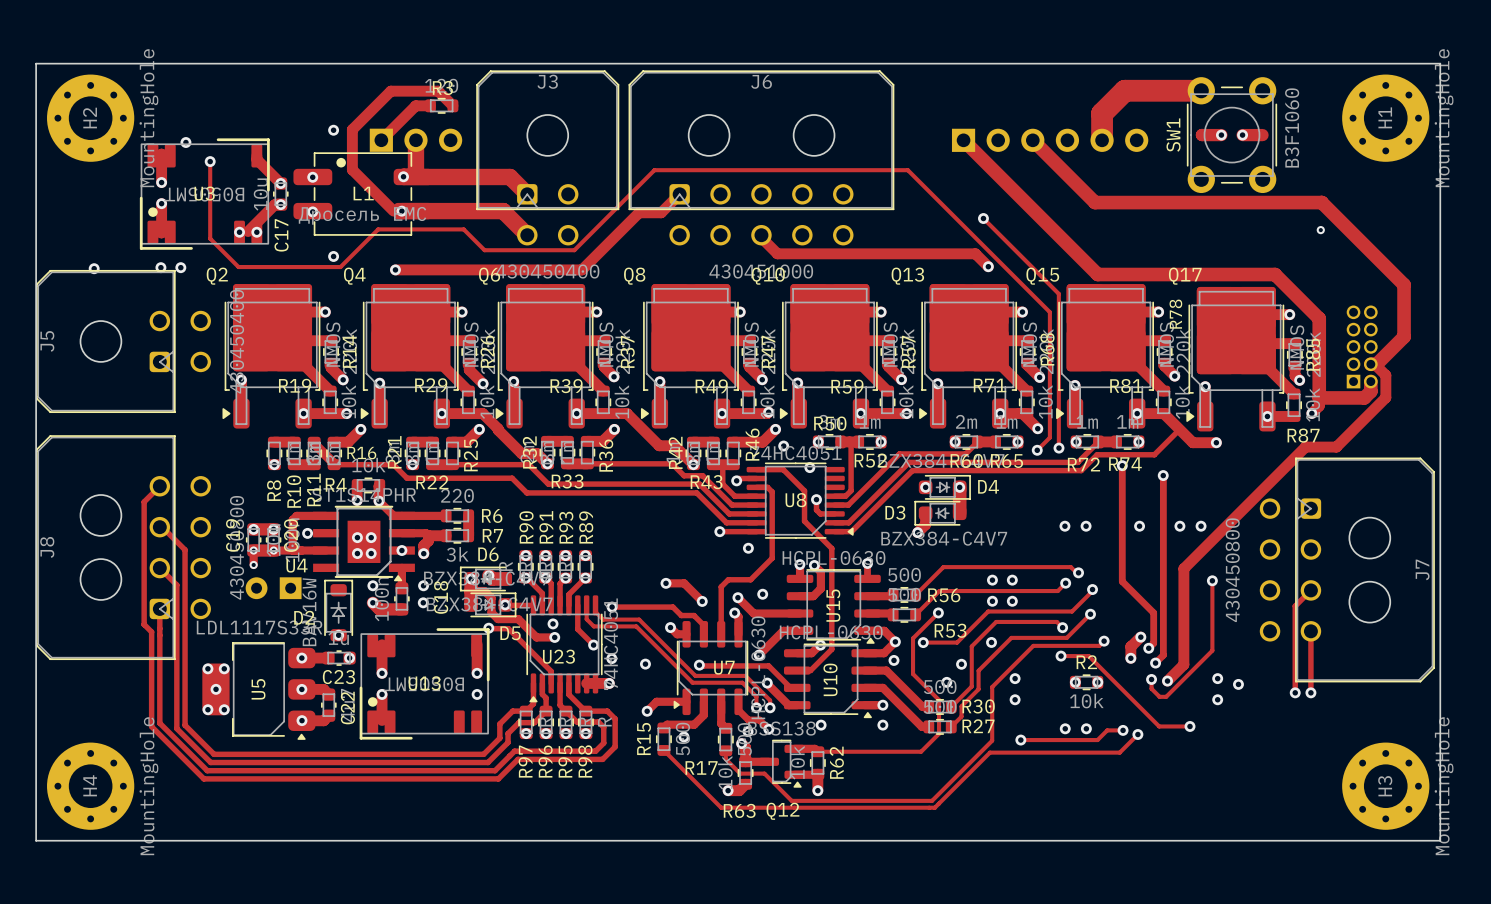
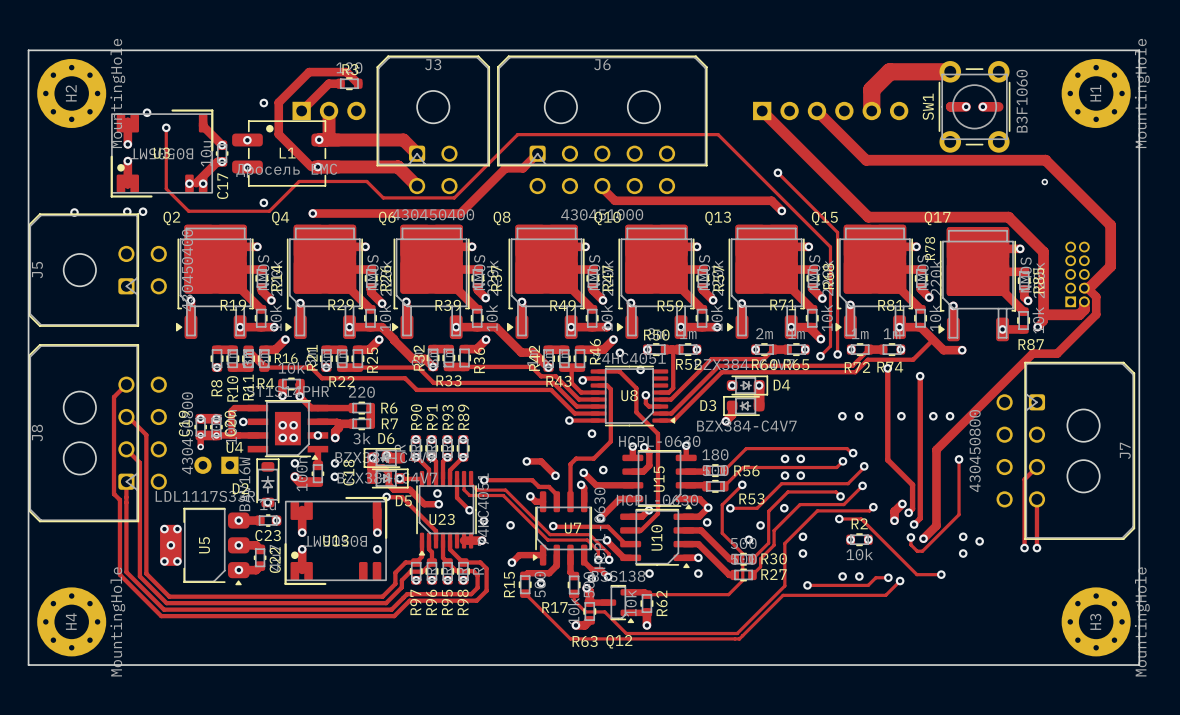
R56 value: 500 (904, 574) -> 180 (715, 454)

